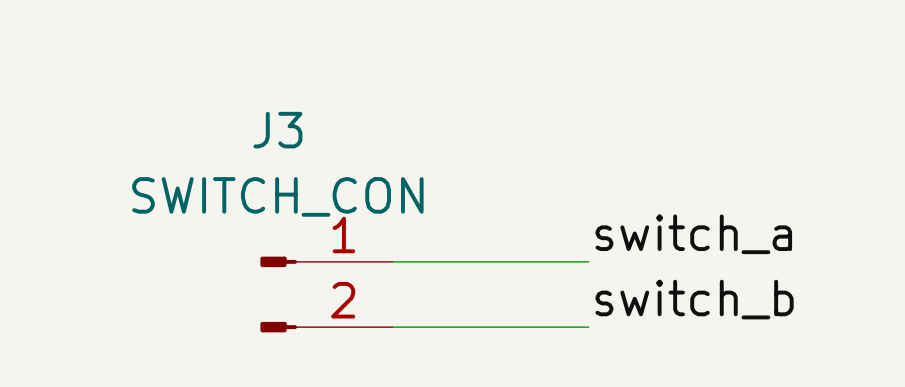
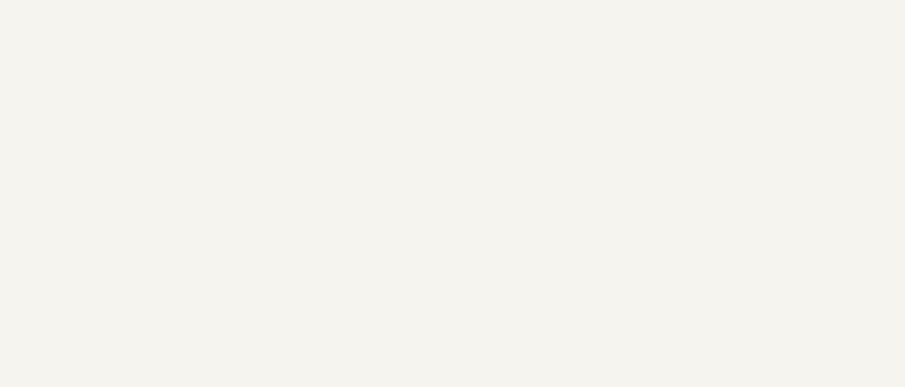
label: switch_a (693, 234) -> none
wire: (392, 261) (588, 261) -> none
J3: SWITCH_CON (326, 294) -> none
label: switch_b (694, 299) -> none
wire: (392, 327) (588, 327) -> none

